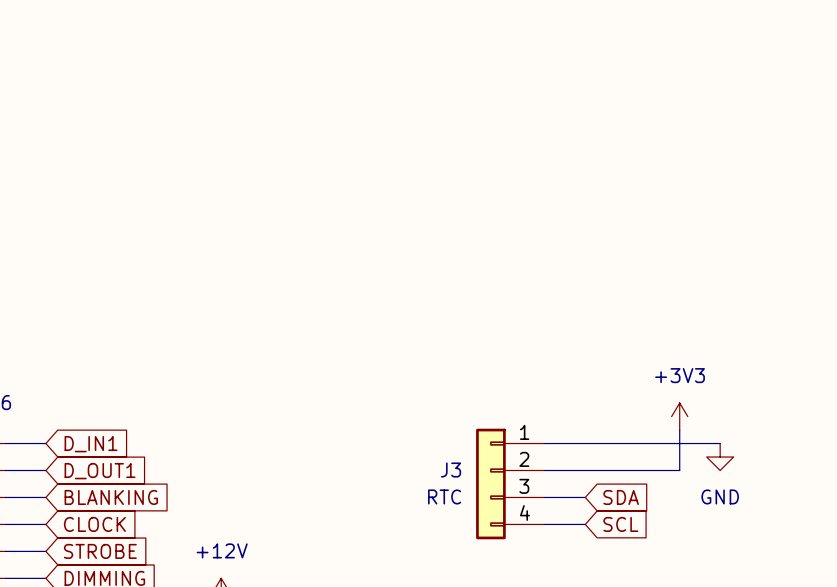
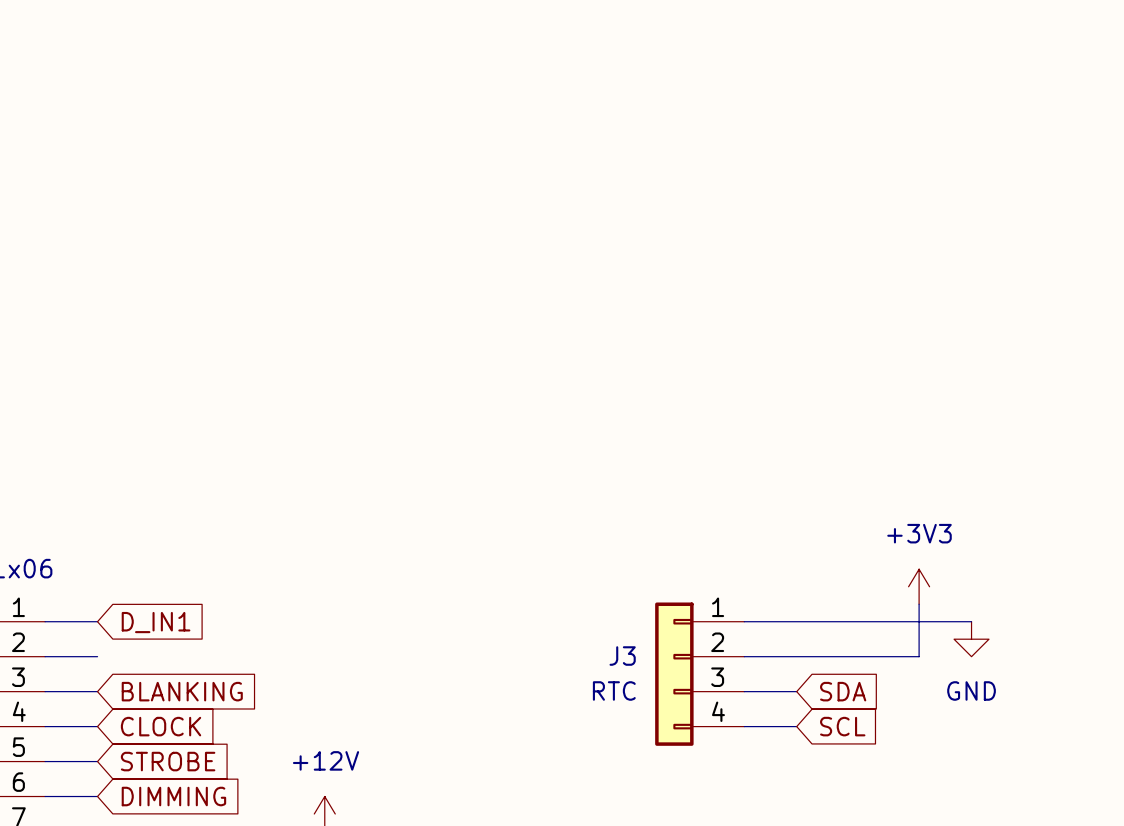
global label: D_OUT1 (100, 471) -> none

